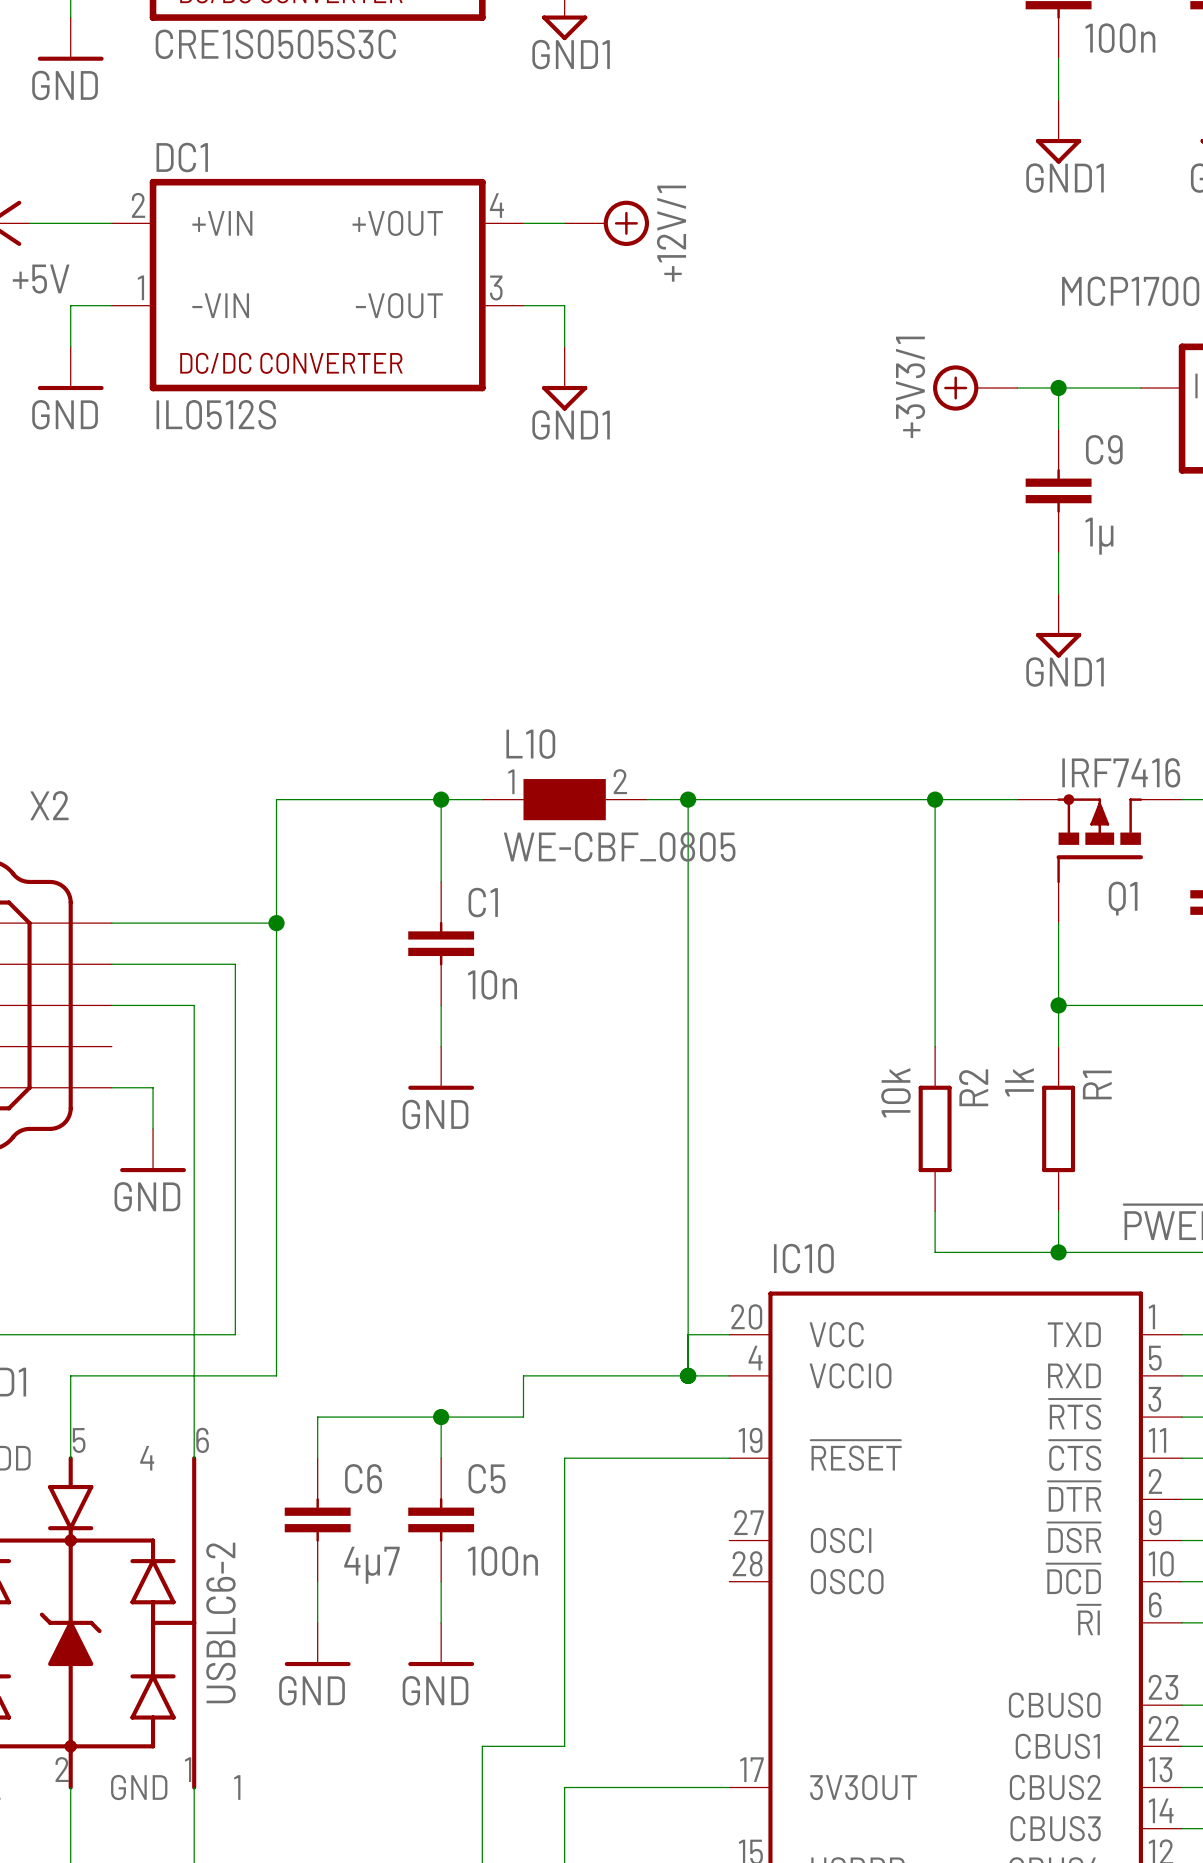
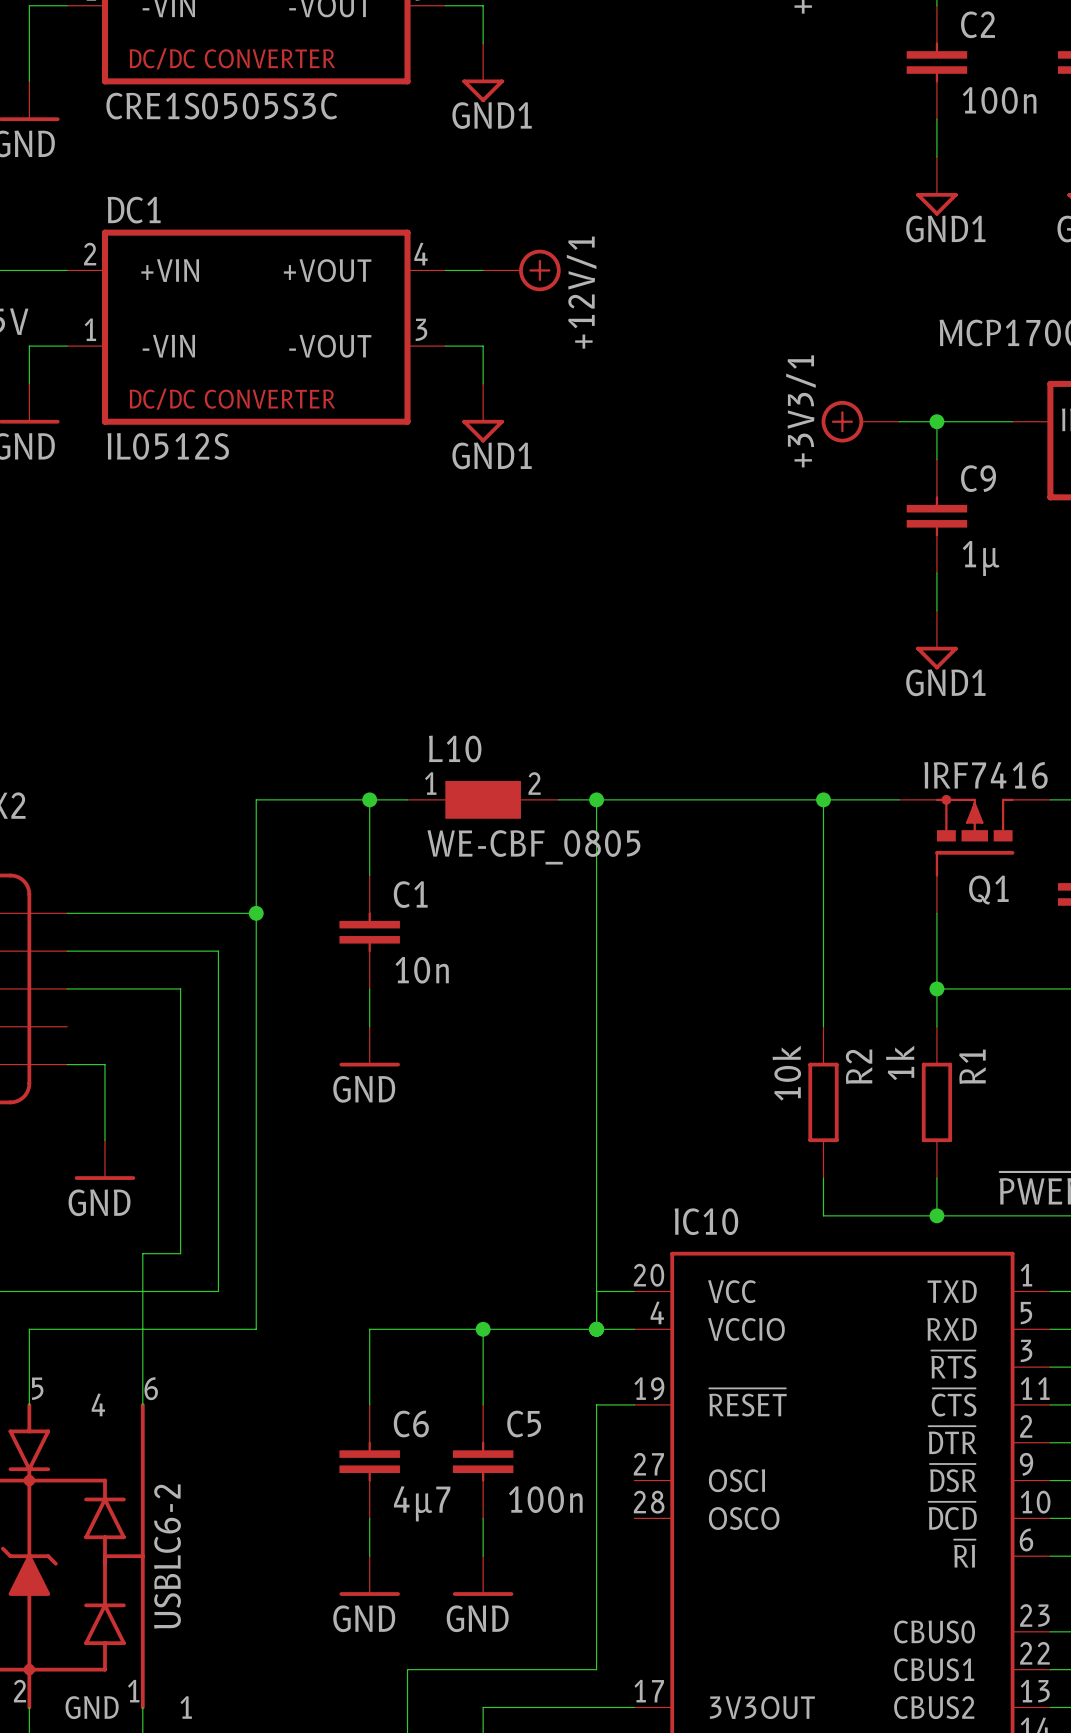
wire: (317, 799) (276, 799) (276, 964) -> (180, 951) (218, 951)
wire: none -> (256, 799) (256, 1329) (218, 1329)
wire: none -> (218, 913) (256, 913)
junction position: (276, 923) -> (256, 913)
wire: (235, 964) (235, 1005) -> (142, 988) (180, 988)
wire: (194, 1005) (194, 1293) -> none
power symbol position: GND (153, 1150) -> GND (104, 1160)
wire: (235, 1293) (235, 1334) -> (180, 1253) (142, 1253)
wire: (276, 1334) (276, 1375) -> (218, 1291) (180, 1291)
wire: (523, 1375) (523, 1417) (317, 1417) (317, 1458) -> (445, 1329) (369, 1329) (369, 1367)
wire: none -> (483, 1329) (483, 1404)
junction: none -> (483, 1329)
junction: (441, 1417) -> none
wire: (688, 1458) (564, 1458) (564, 1581) -> (596, 1404) (596, 1669) (483, 1669)
C5 name: C5 (487, 1478) -> C6 (411, 1424)
C6: 4µ7 (317, 1519) -> none
C5: none -> 100n (483, 1461)
C5 value: 100n (502, 1561) -> 4µ7 (422, 1503)
wire: (317, 1581) (317, 1622) -> none
wire: (564, 1622) (564, 1746) -> none
power symbol: GND (317, 1644) -> none
power symbol: none -> GND (483, 1576)

